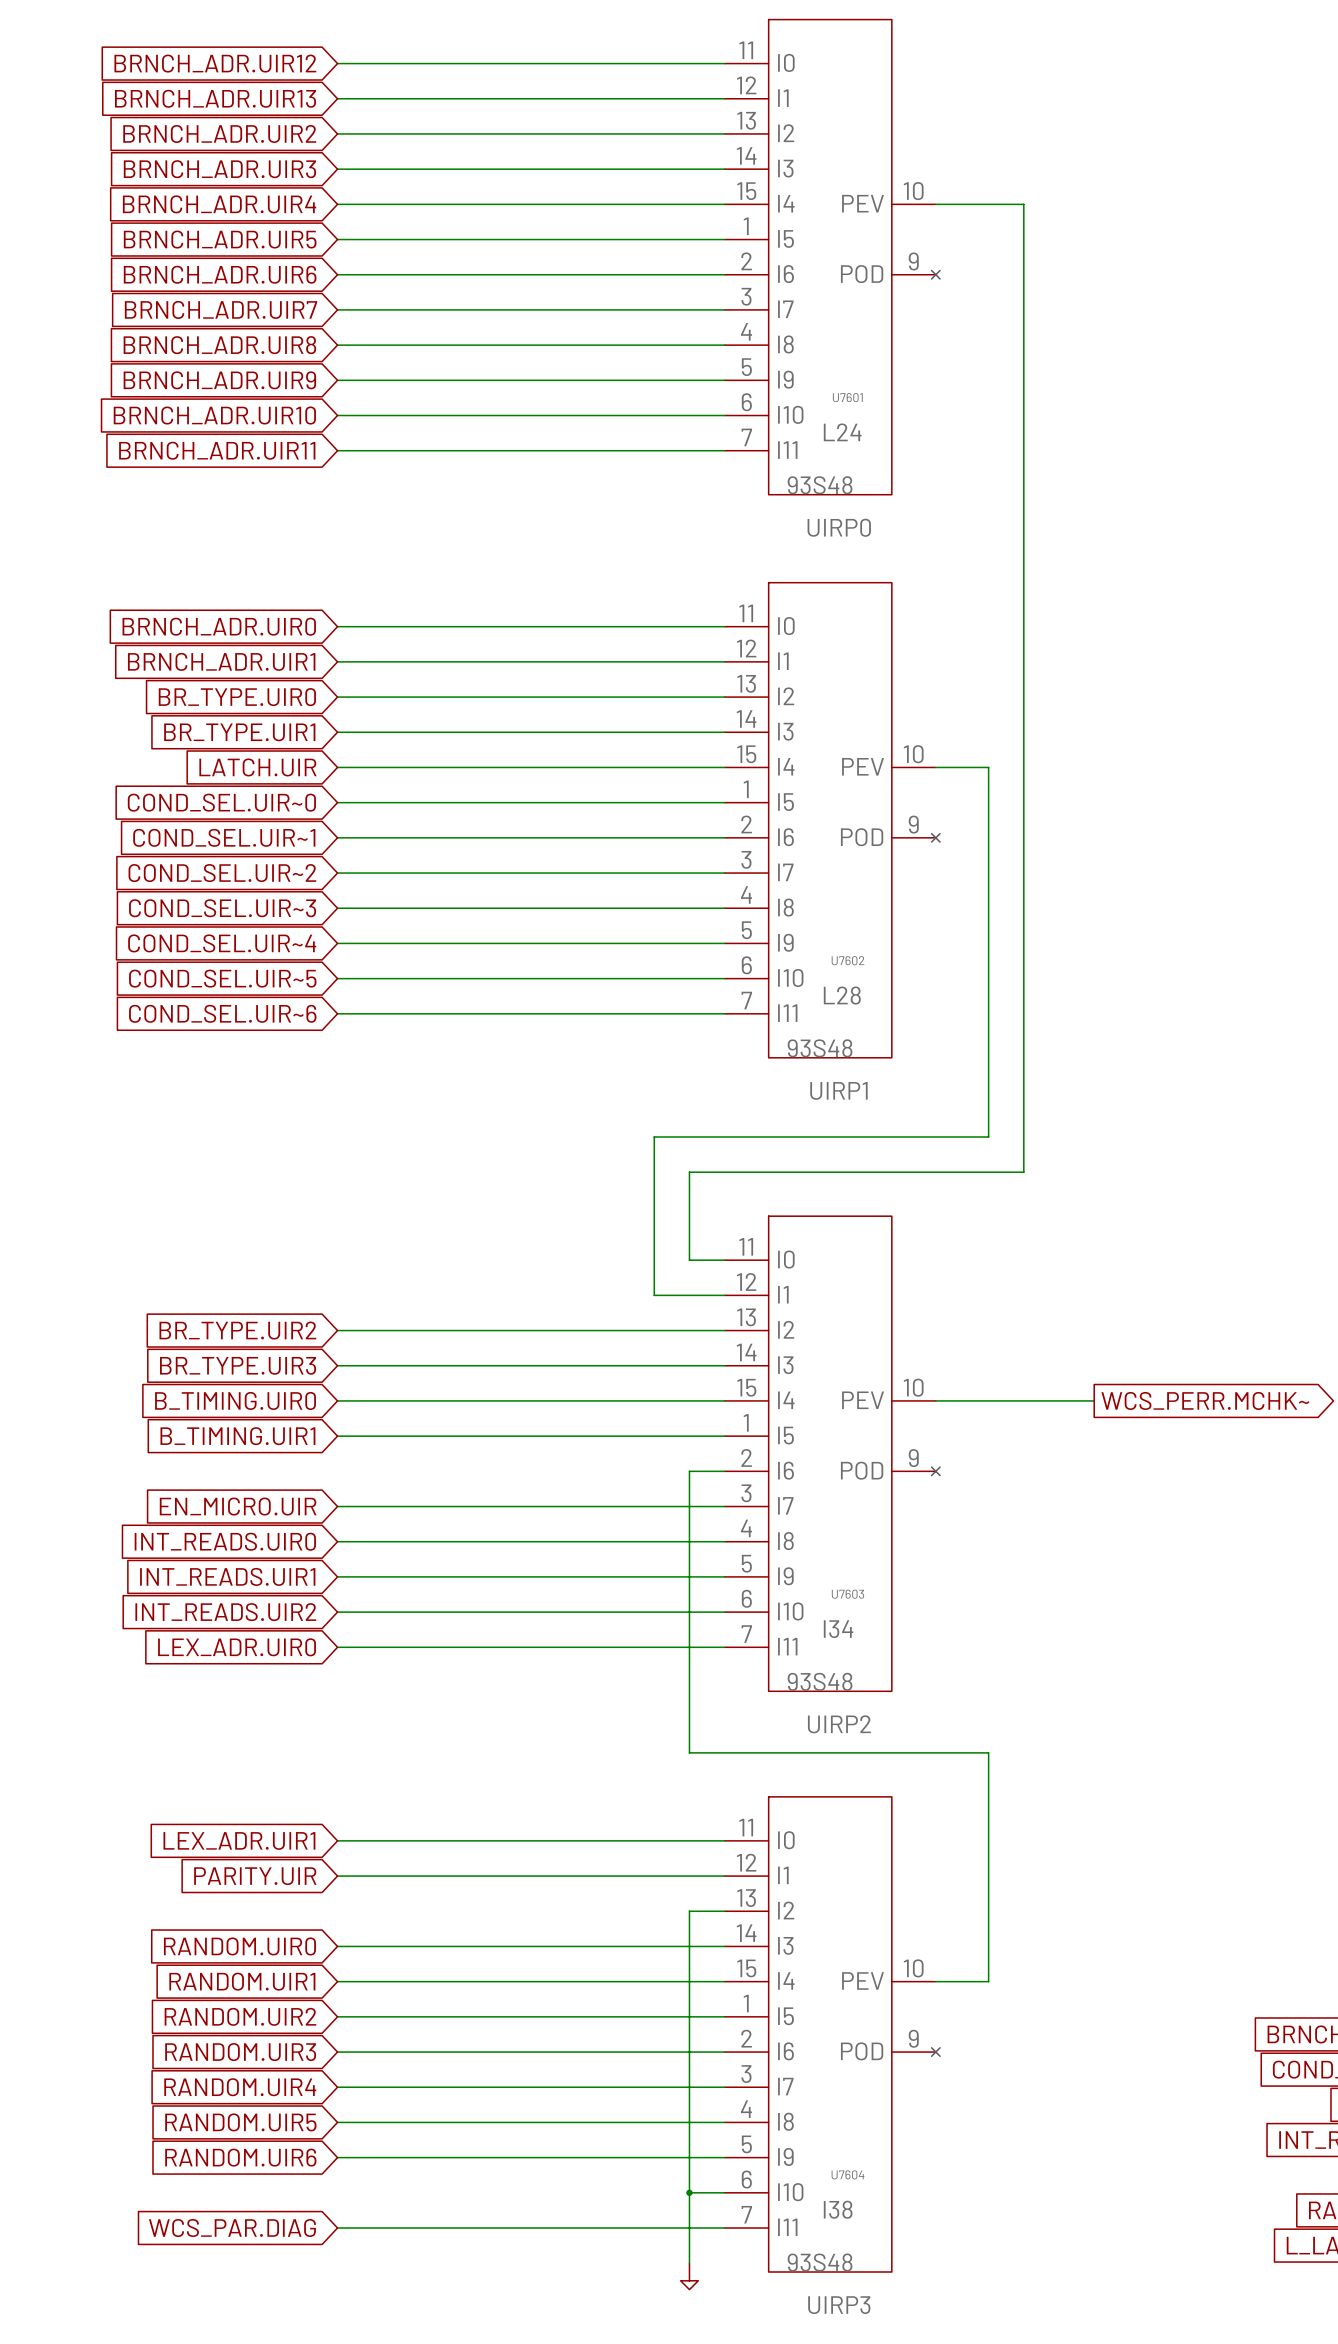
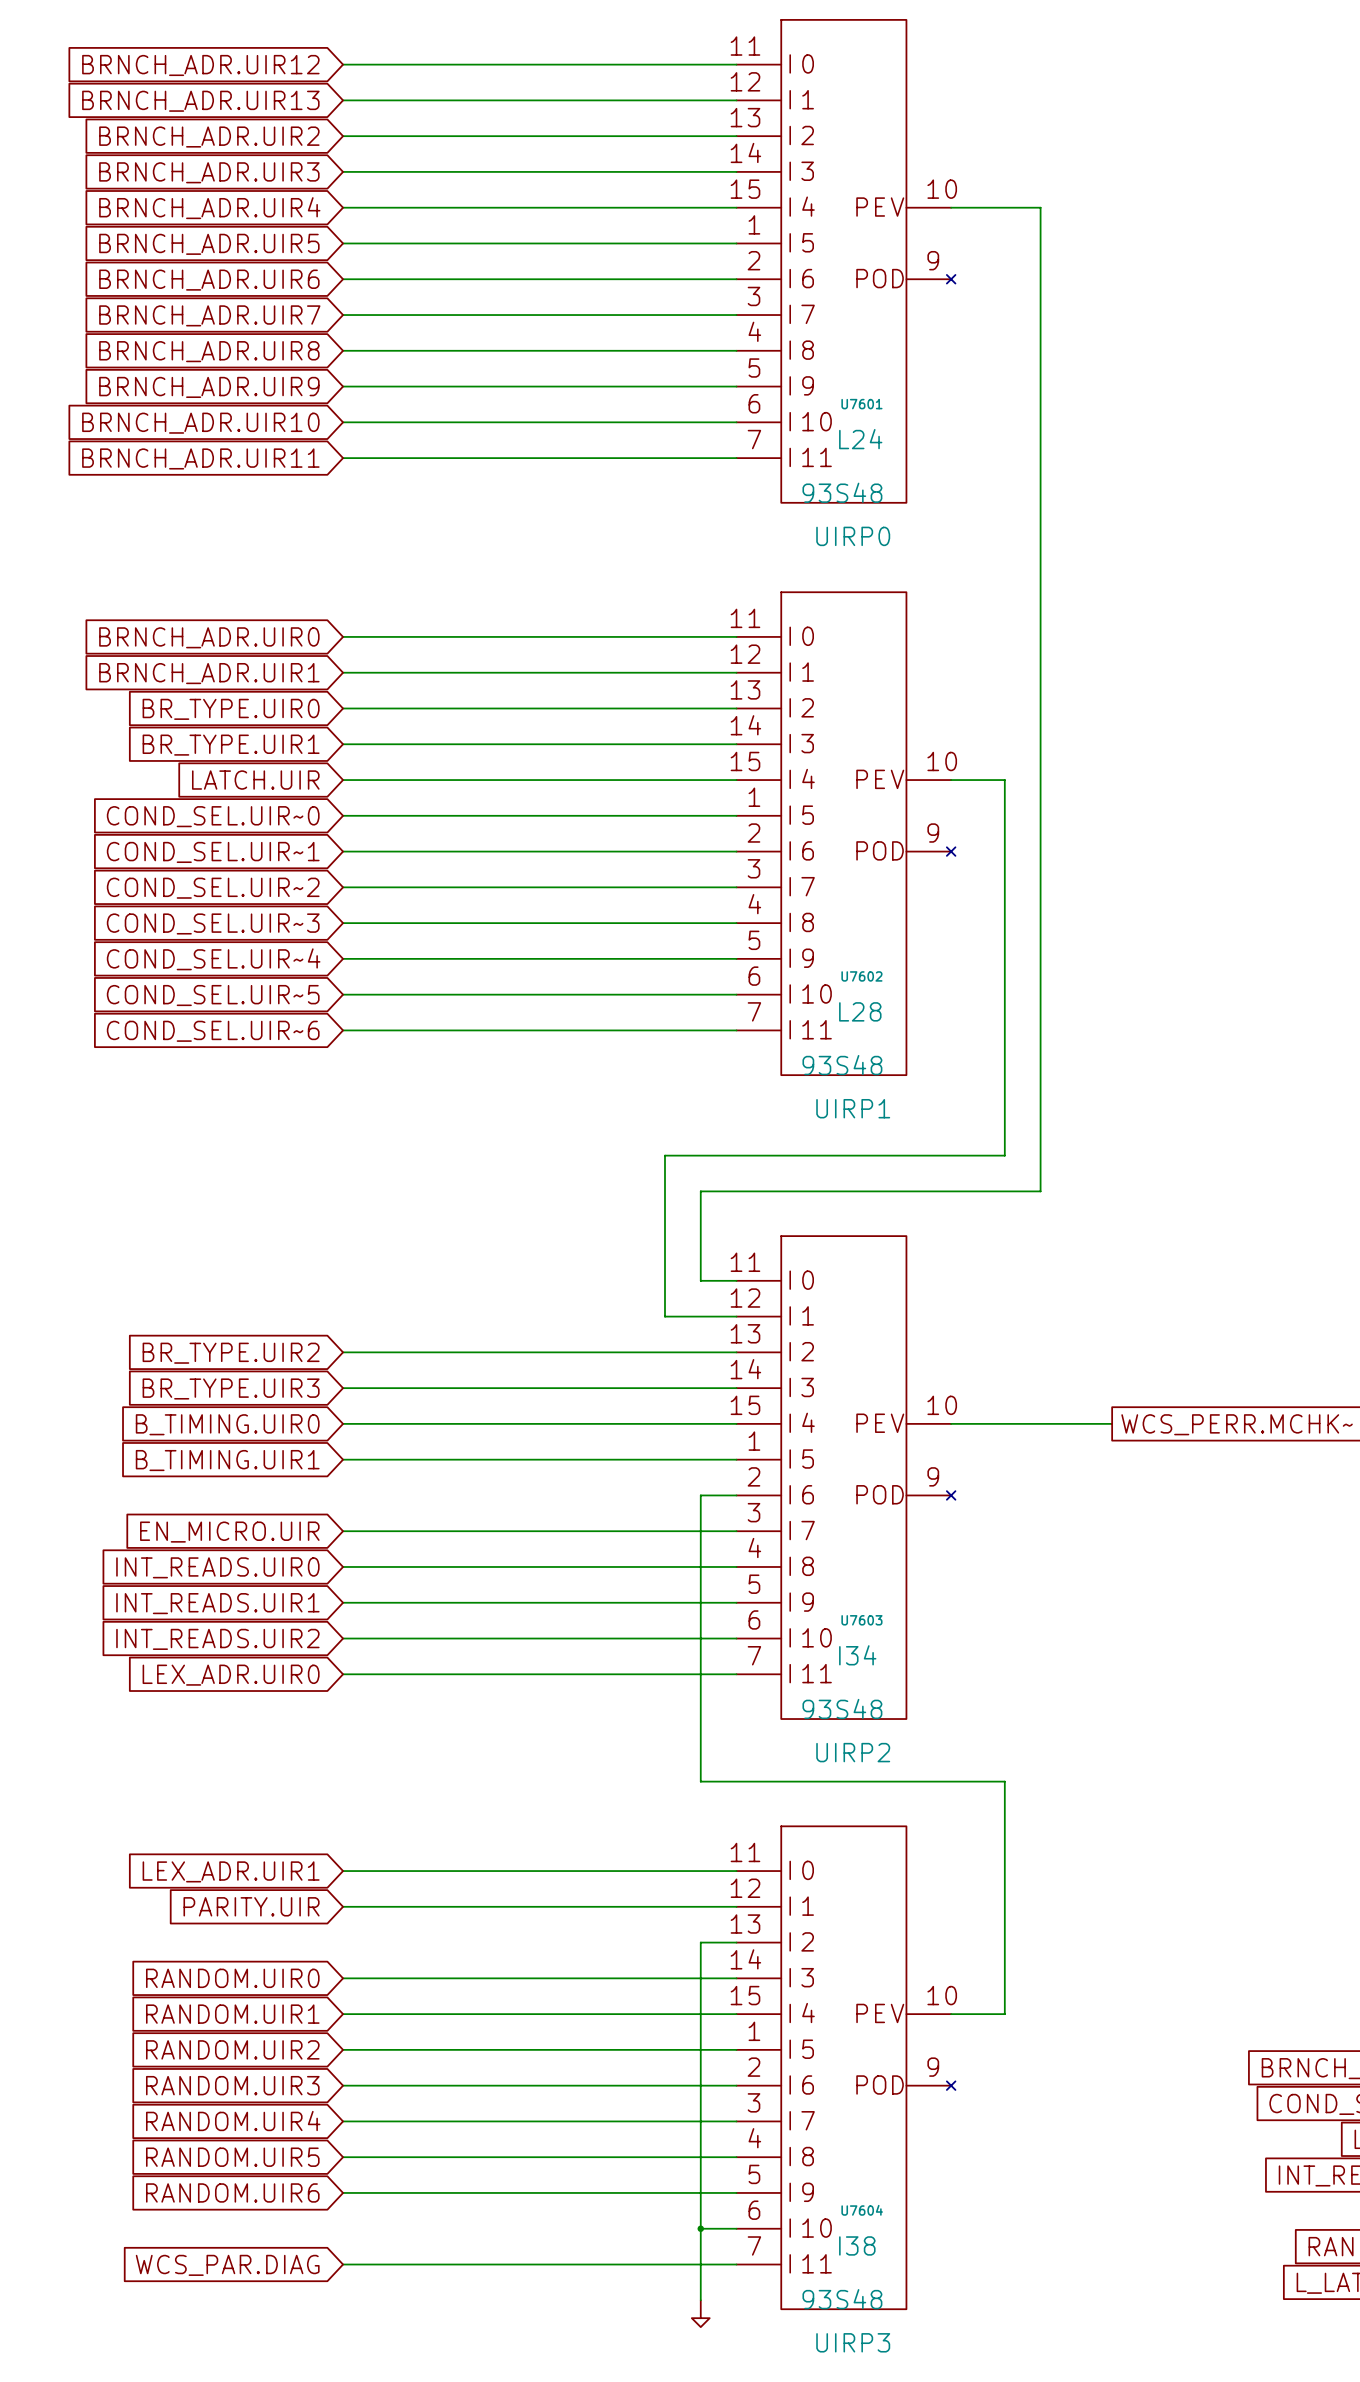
U7601 symbol: [724, 19, 936, 495] -> [736, 19, 952, 503]
U7602 symbol: [724, 582, 936, 1058] -> [736, 592, 952, 1076]
U7603 symbol: [724, 1216, 936, 1692] -> [736, 1236, 952, 1720]
U7604 symbol: [724, 1796, 936, 2273] -> [736, 1826, 952, 2310]

